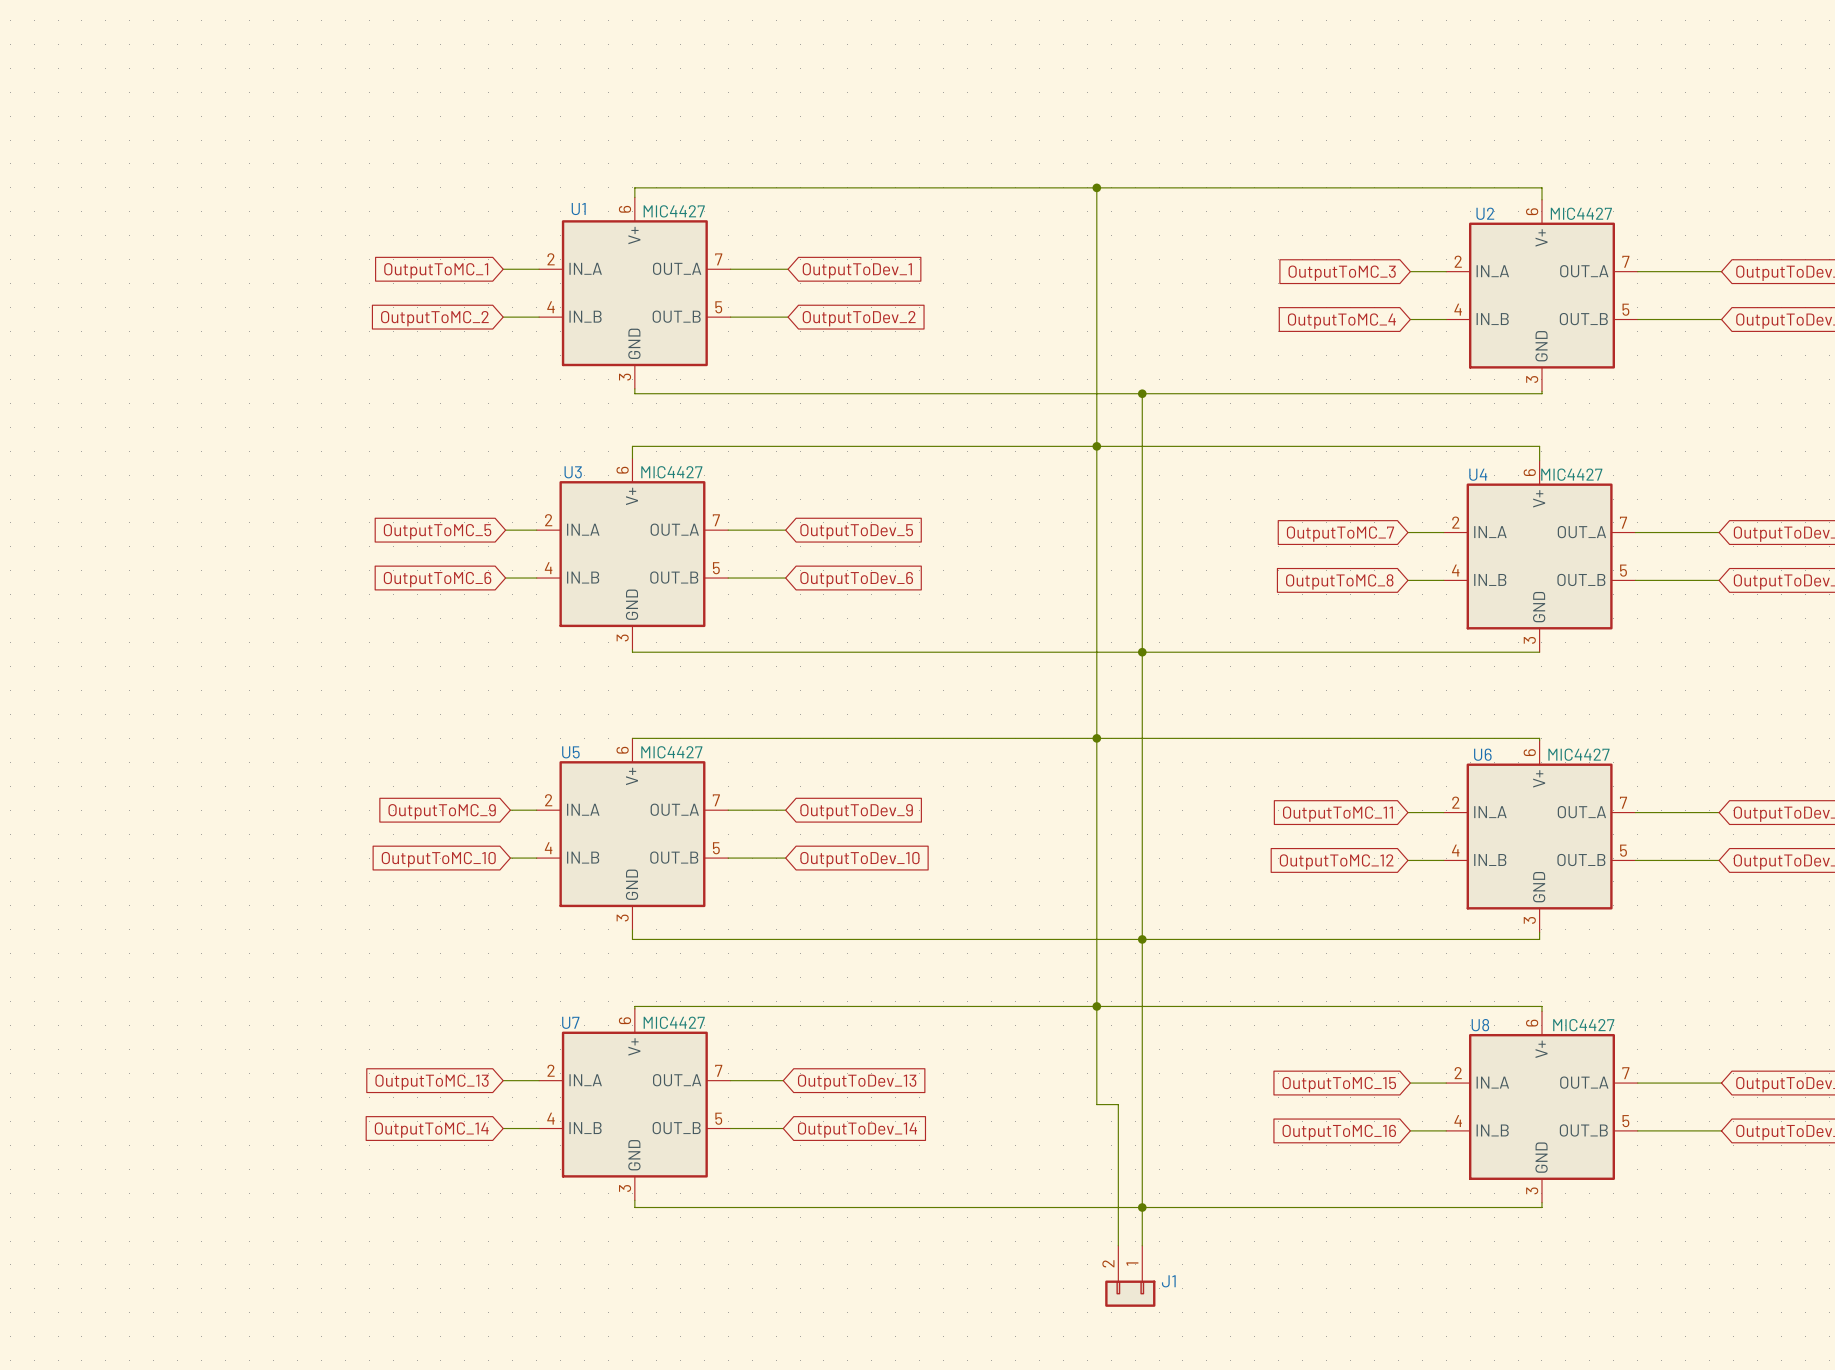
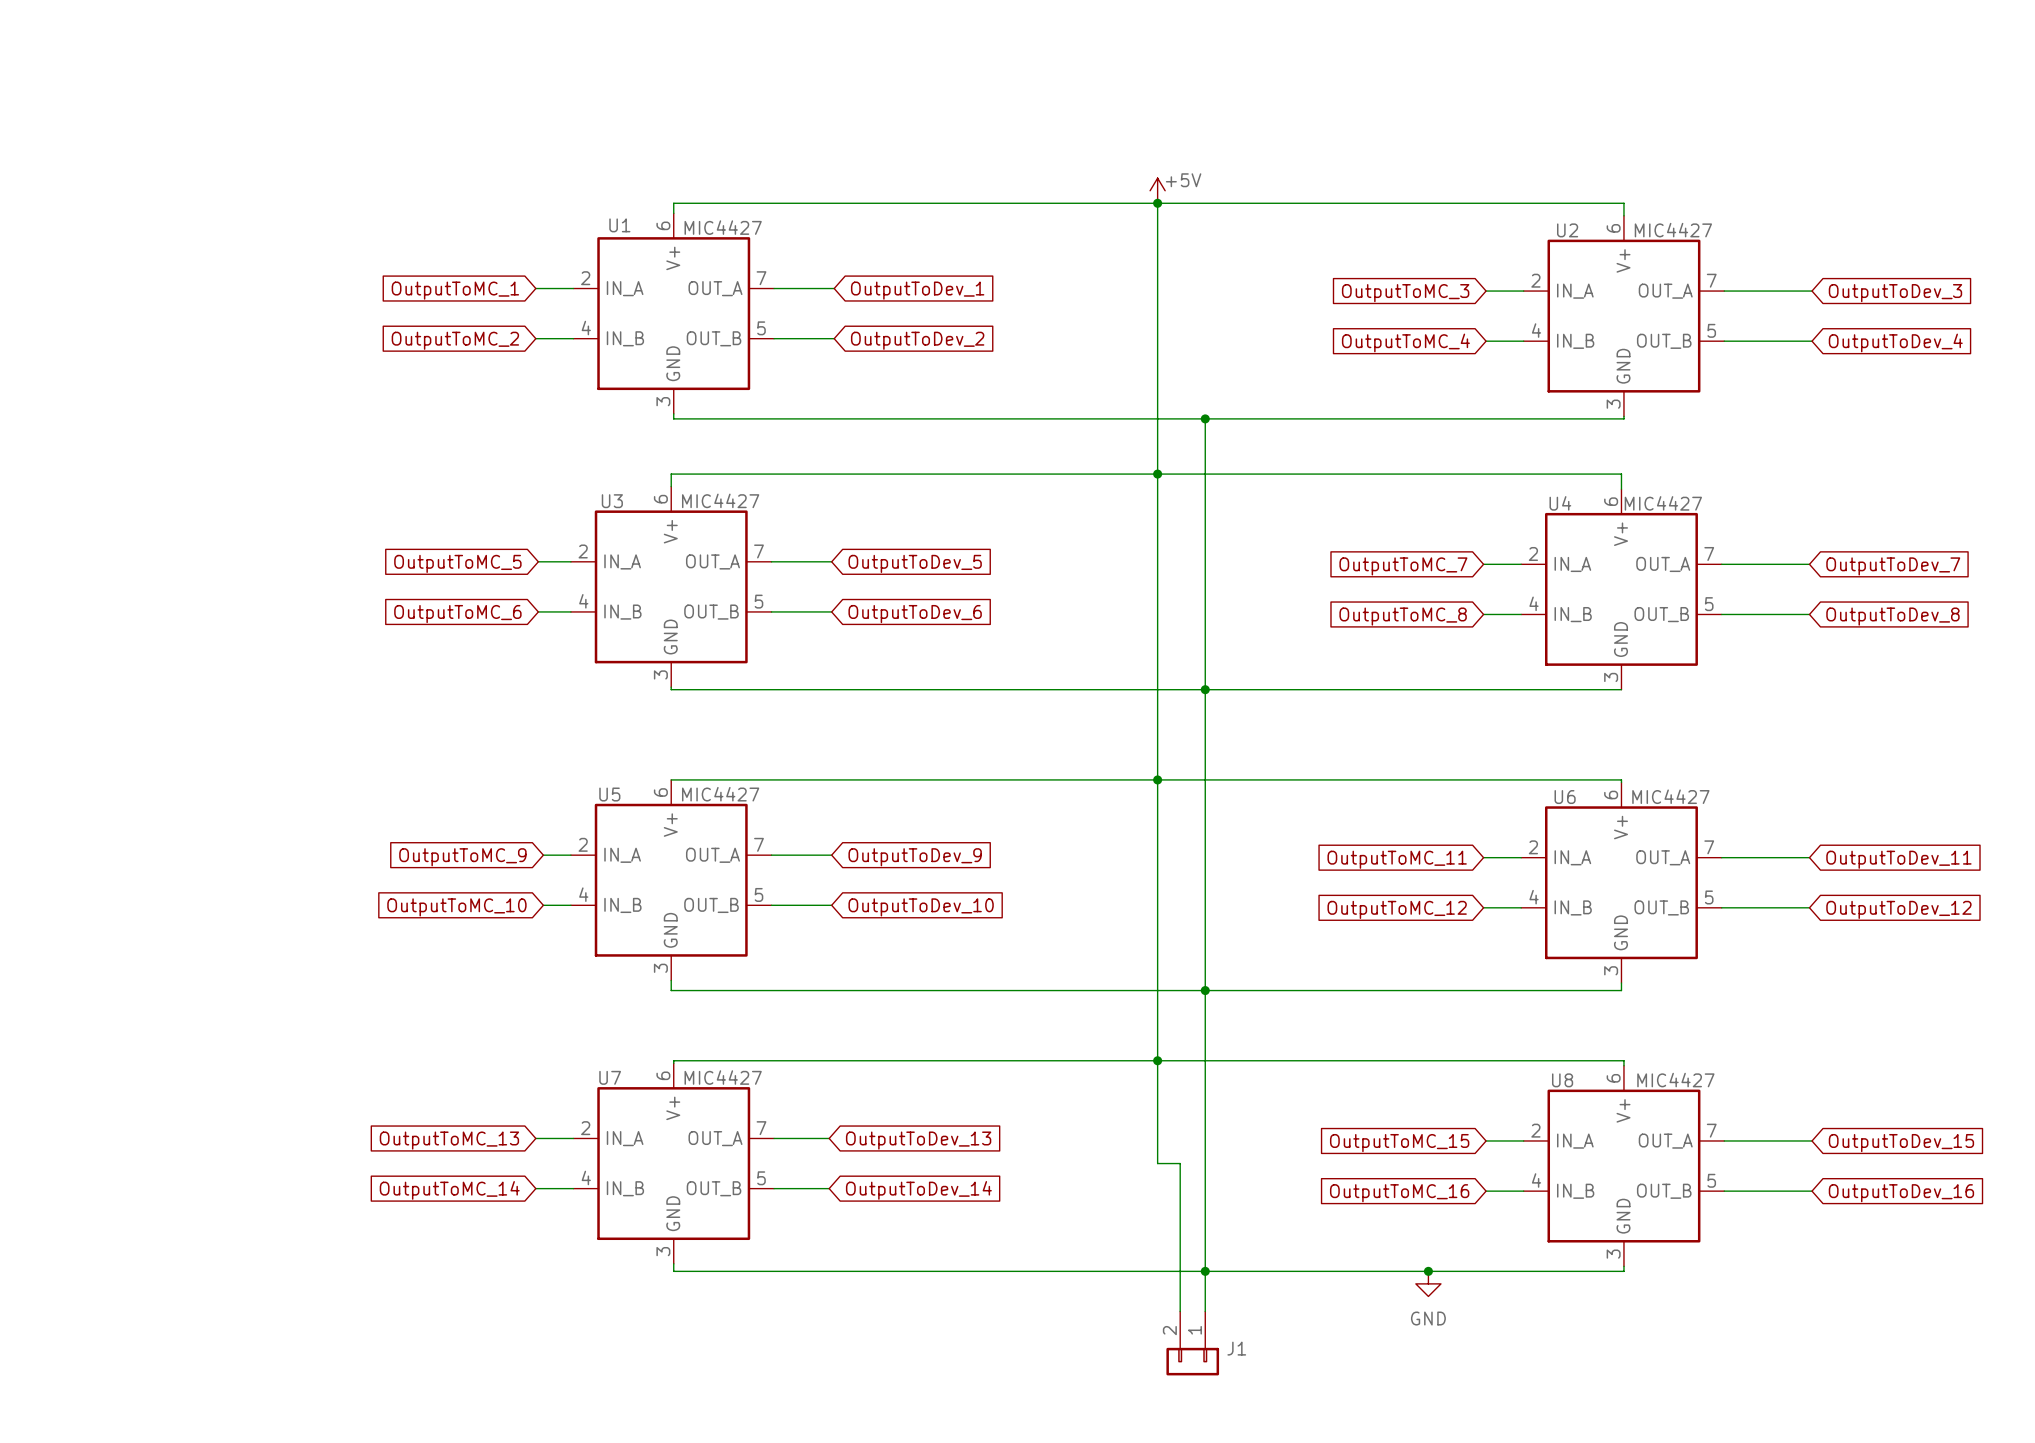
power symbol: none -> +5V (1157, 190)
junction: none -> (1428, 1271)
power symbol: none -> GND (1428, 1283)

